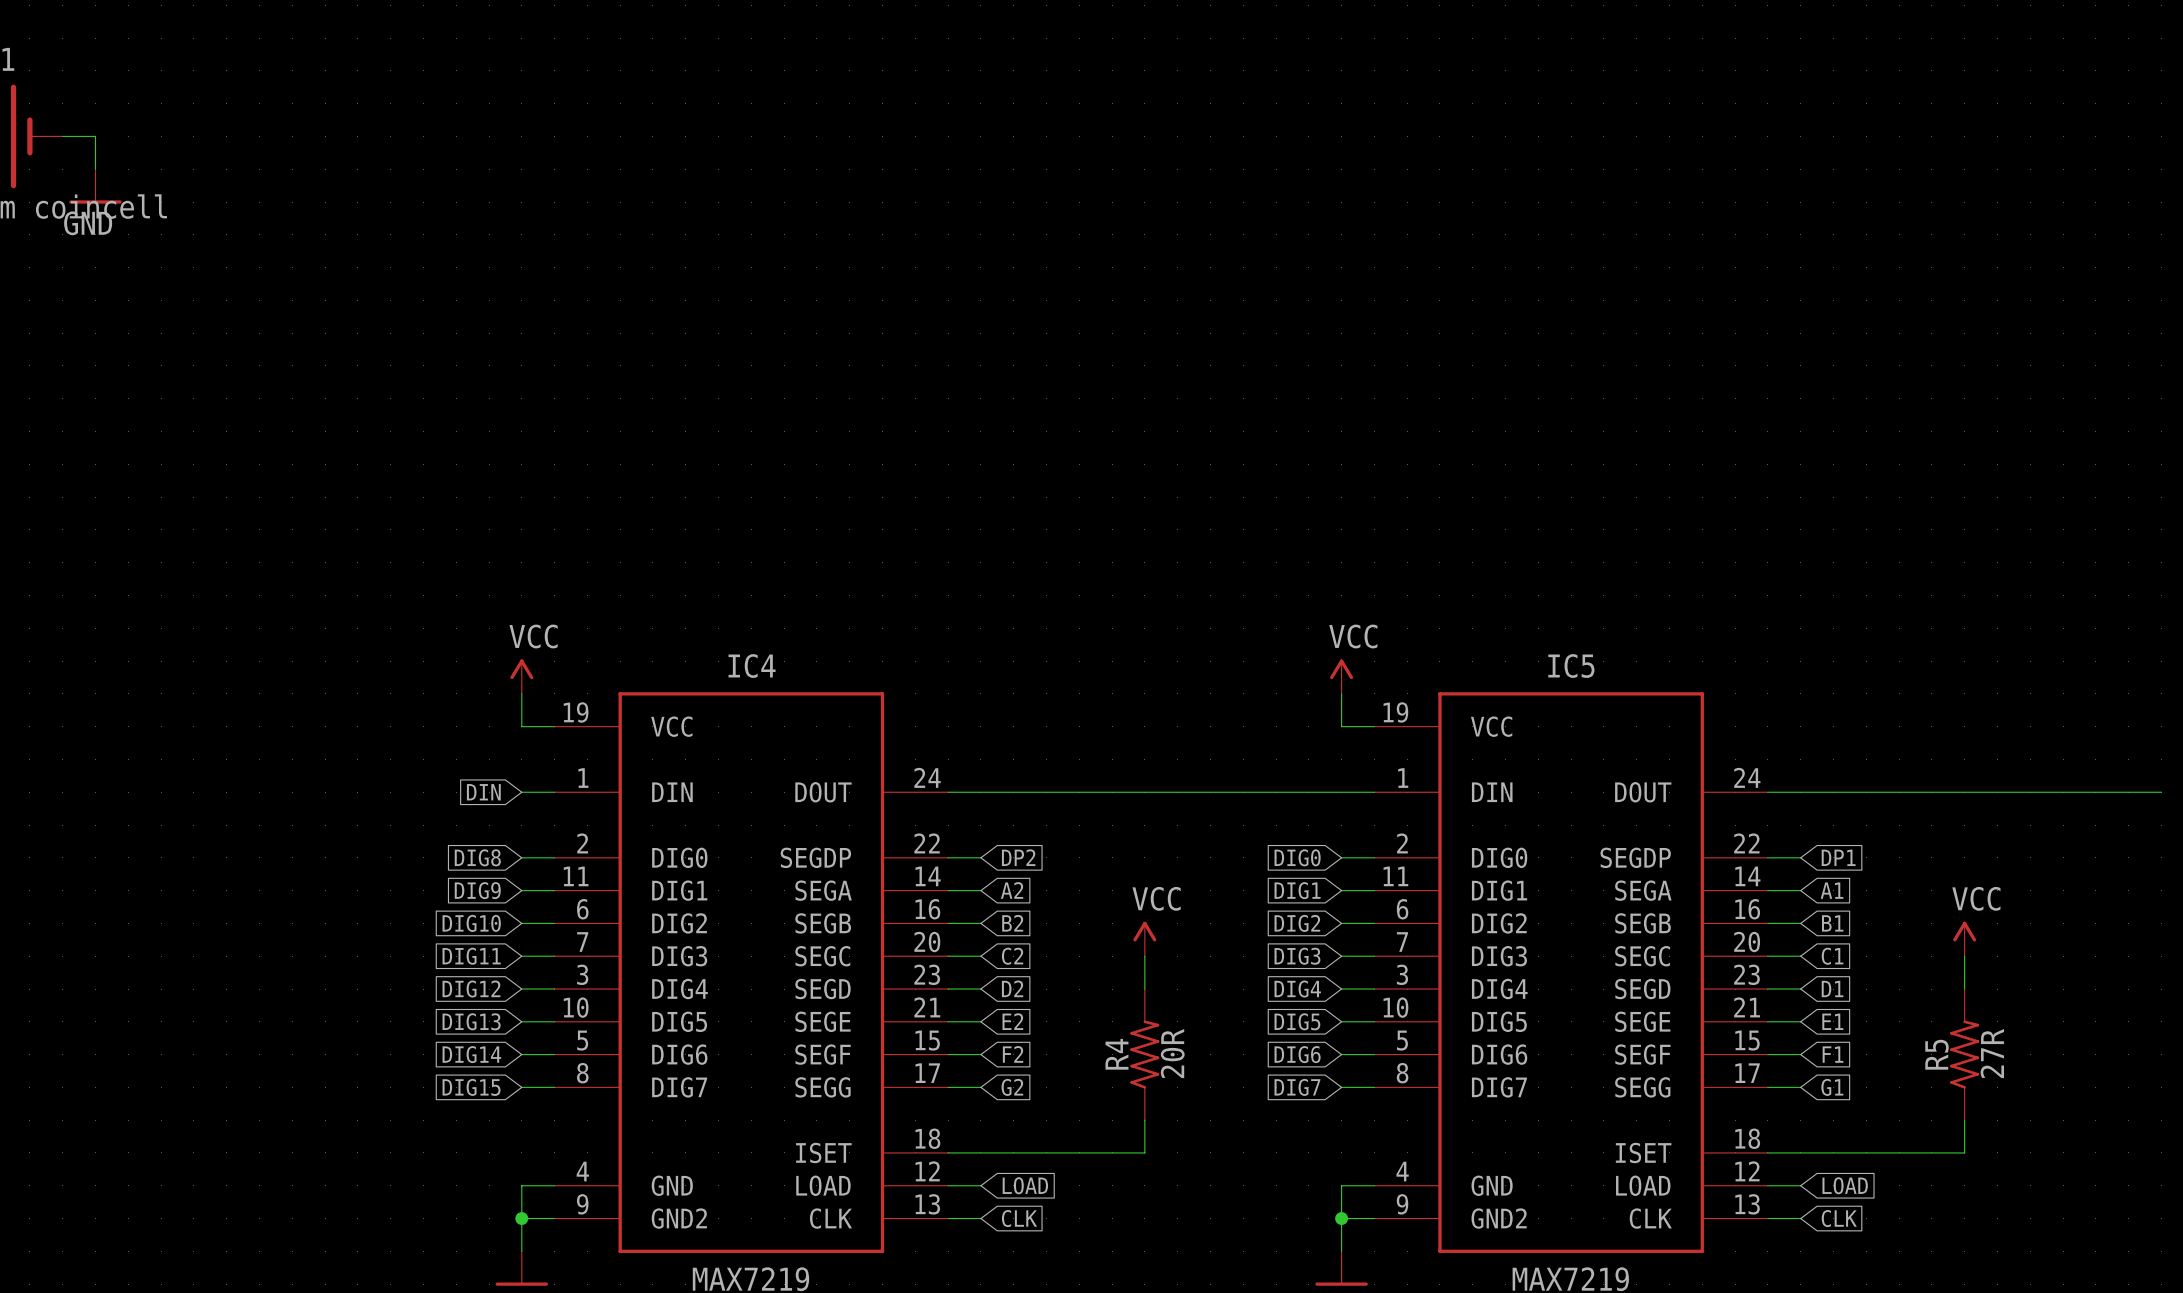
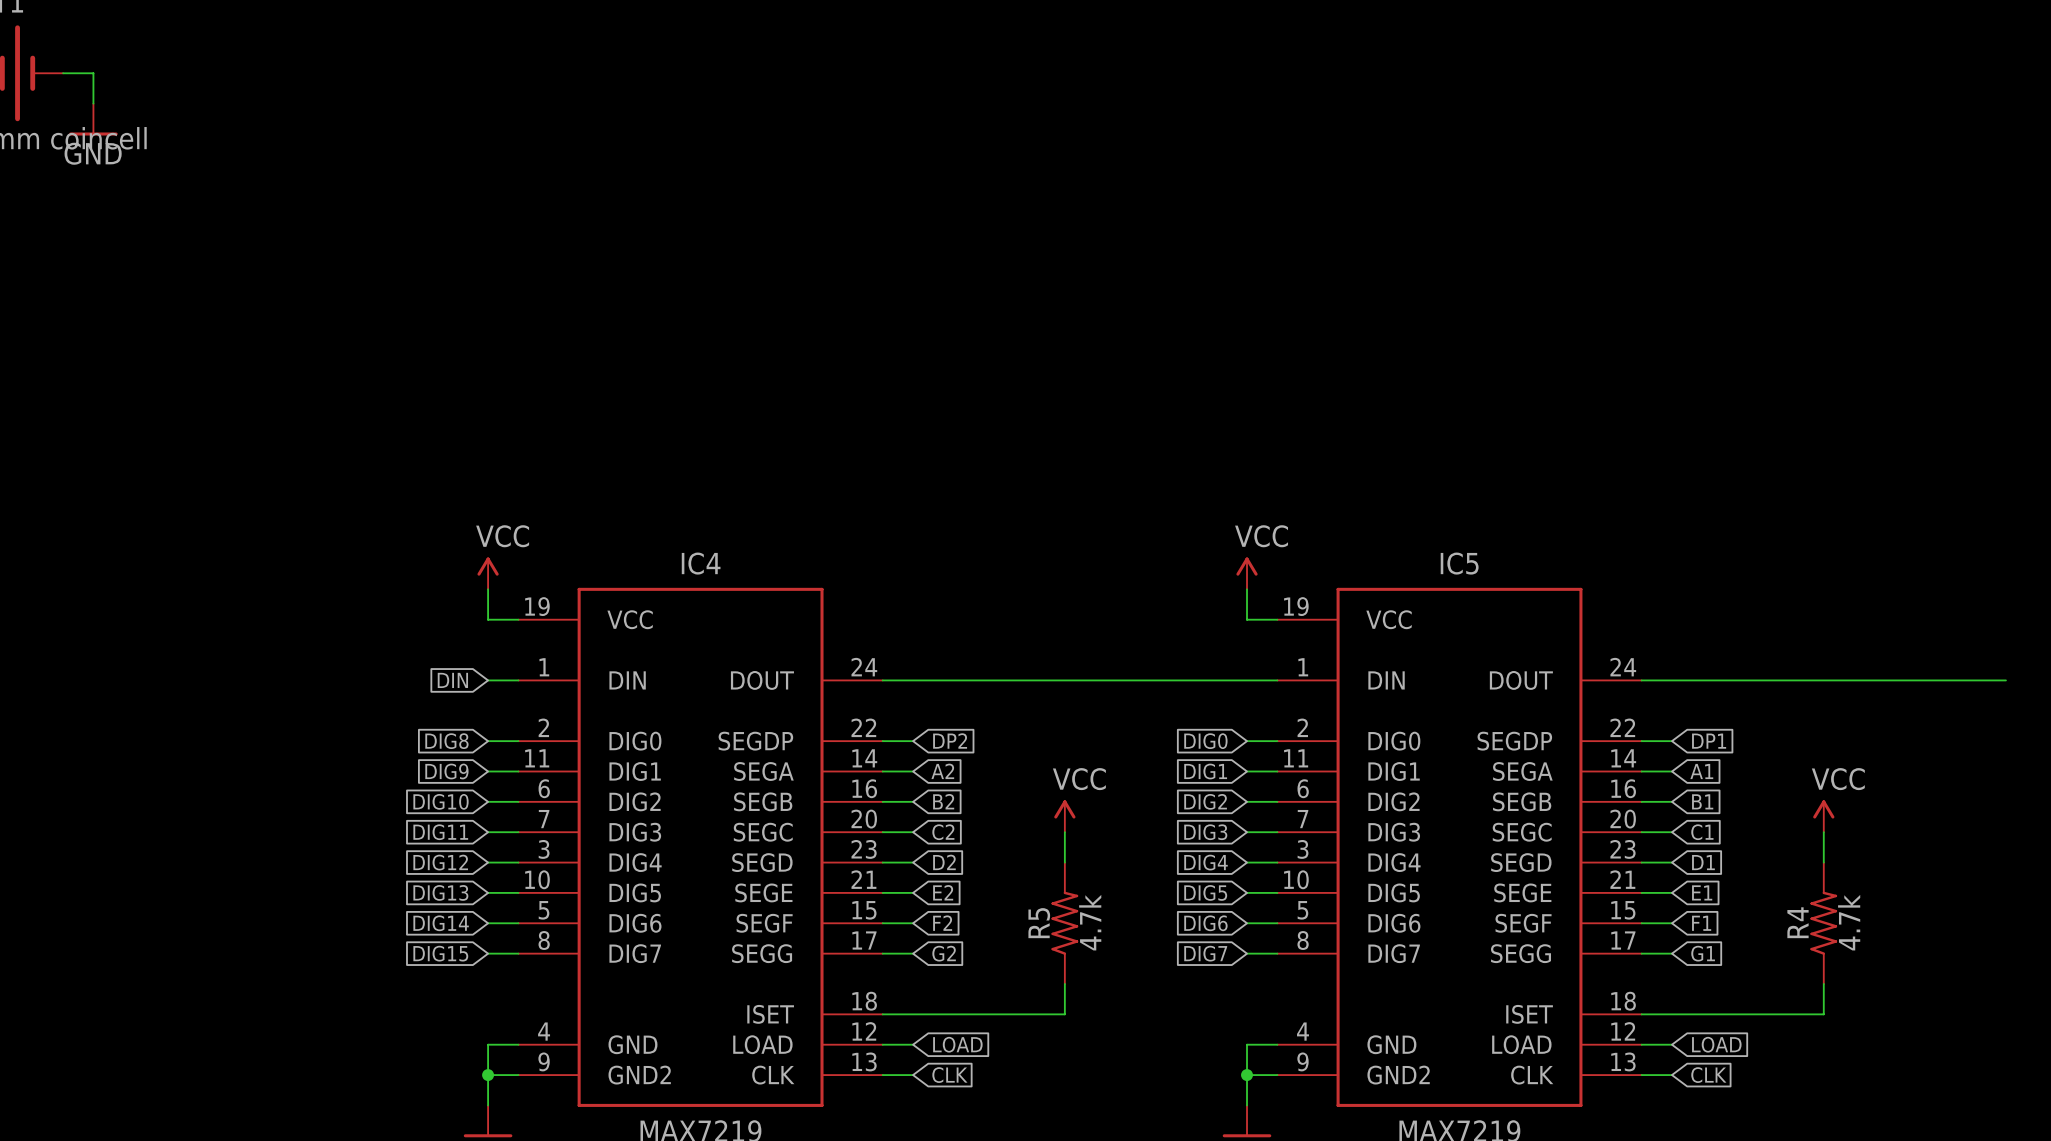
R4 value: 20R (1172, 1053) -> 4.7k (1090, 922)
R5 value: 27R (1992, 1053) -> 4.7k (1849, 922)
R4 name: R4 (1116, 1054) -> R5 (1039, 923)
R5 name: R5 (1936, 1054) -> R4 (1797, 922)

